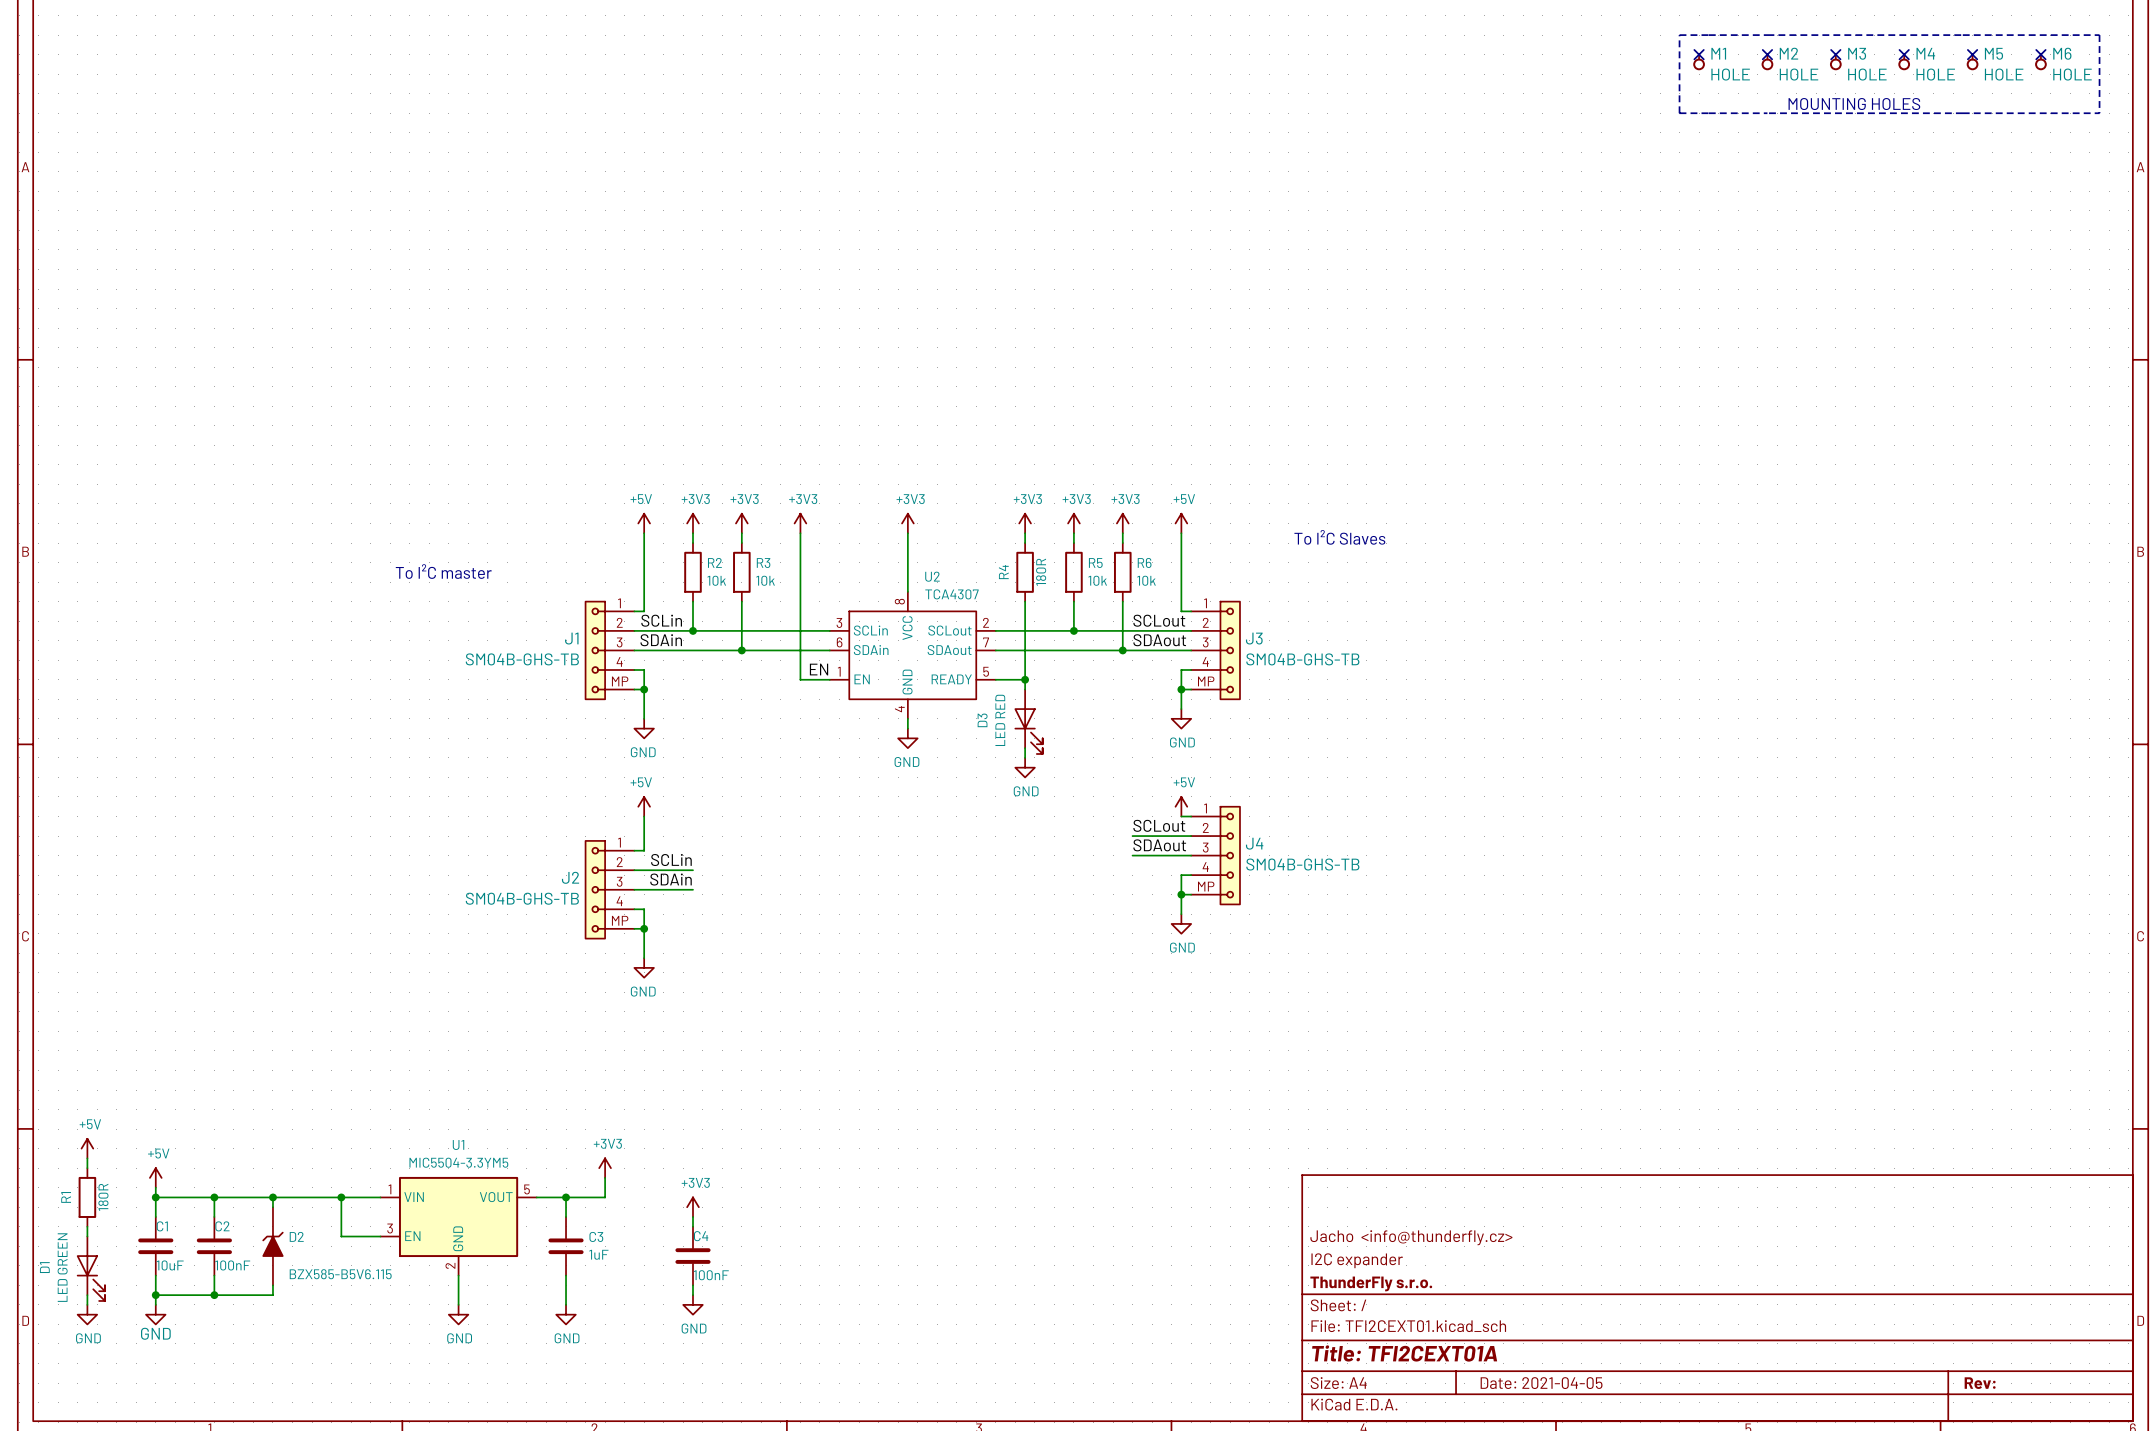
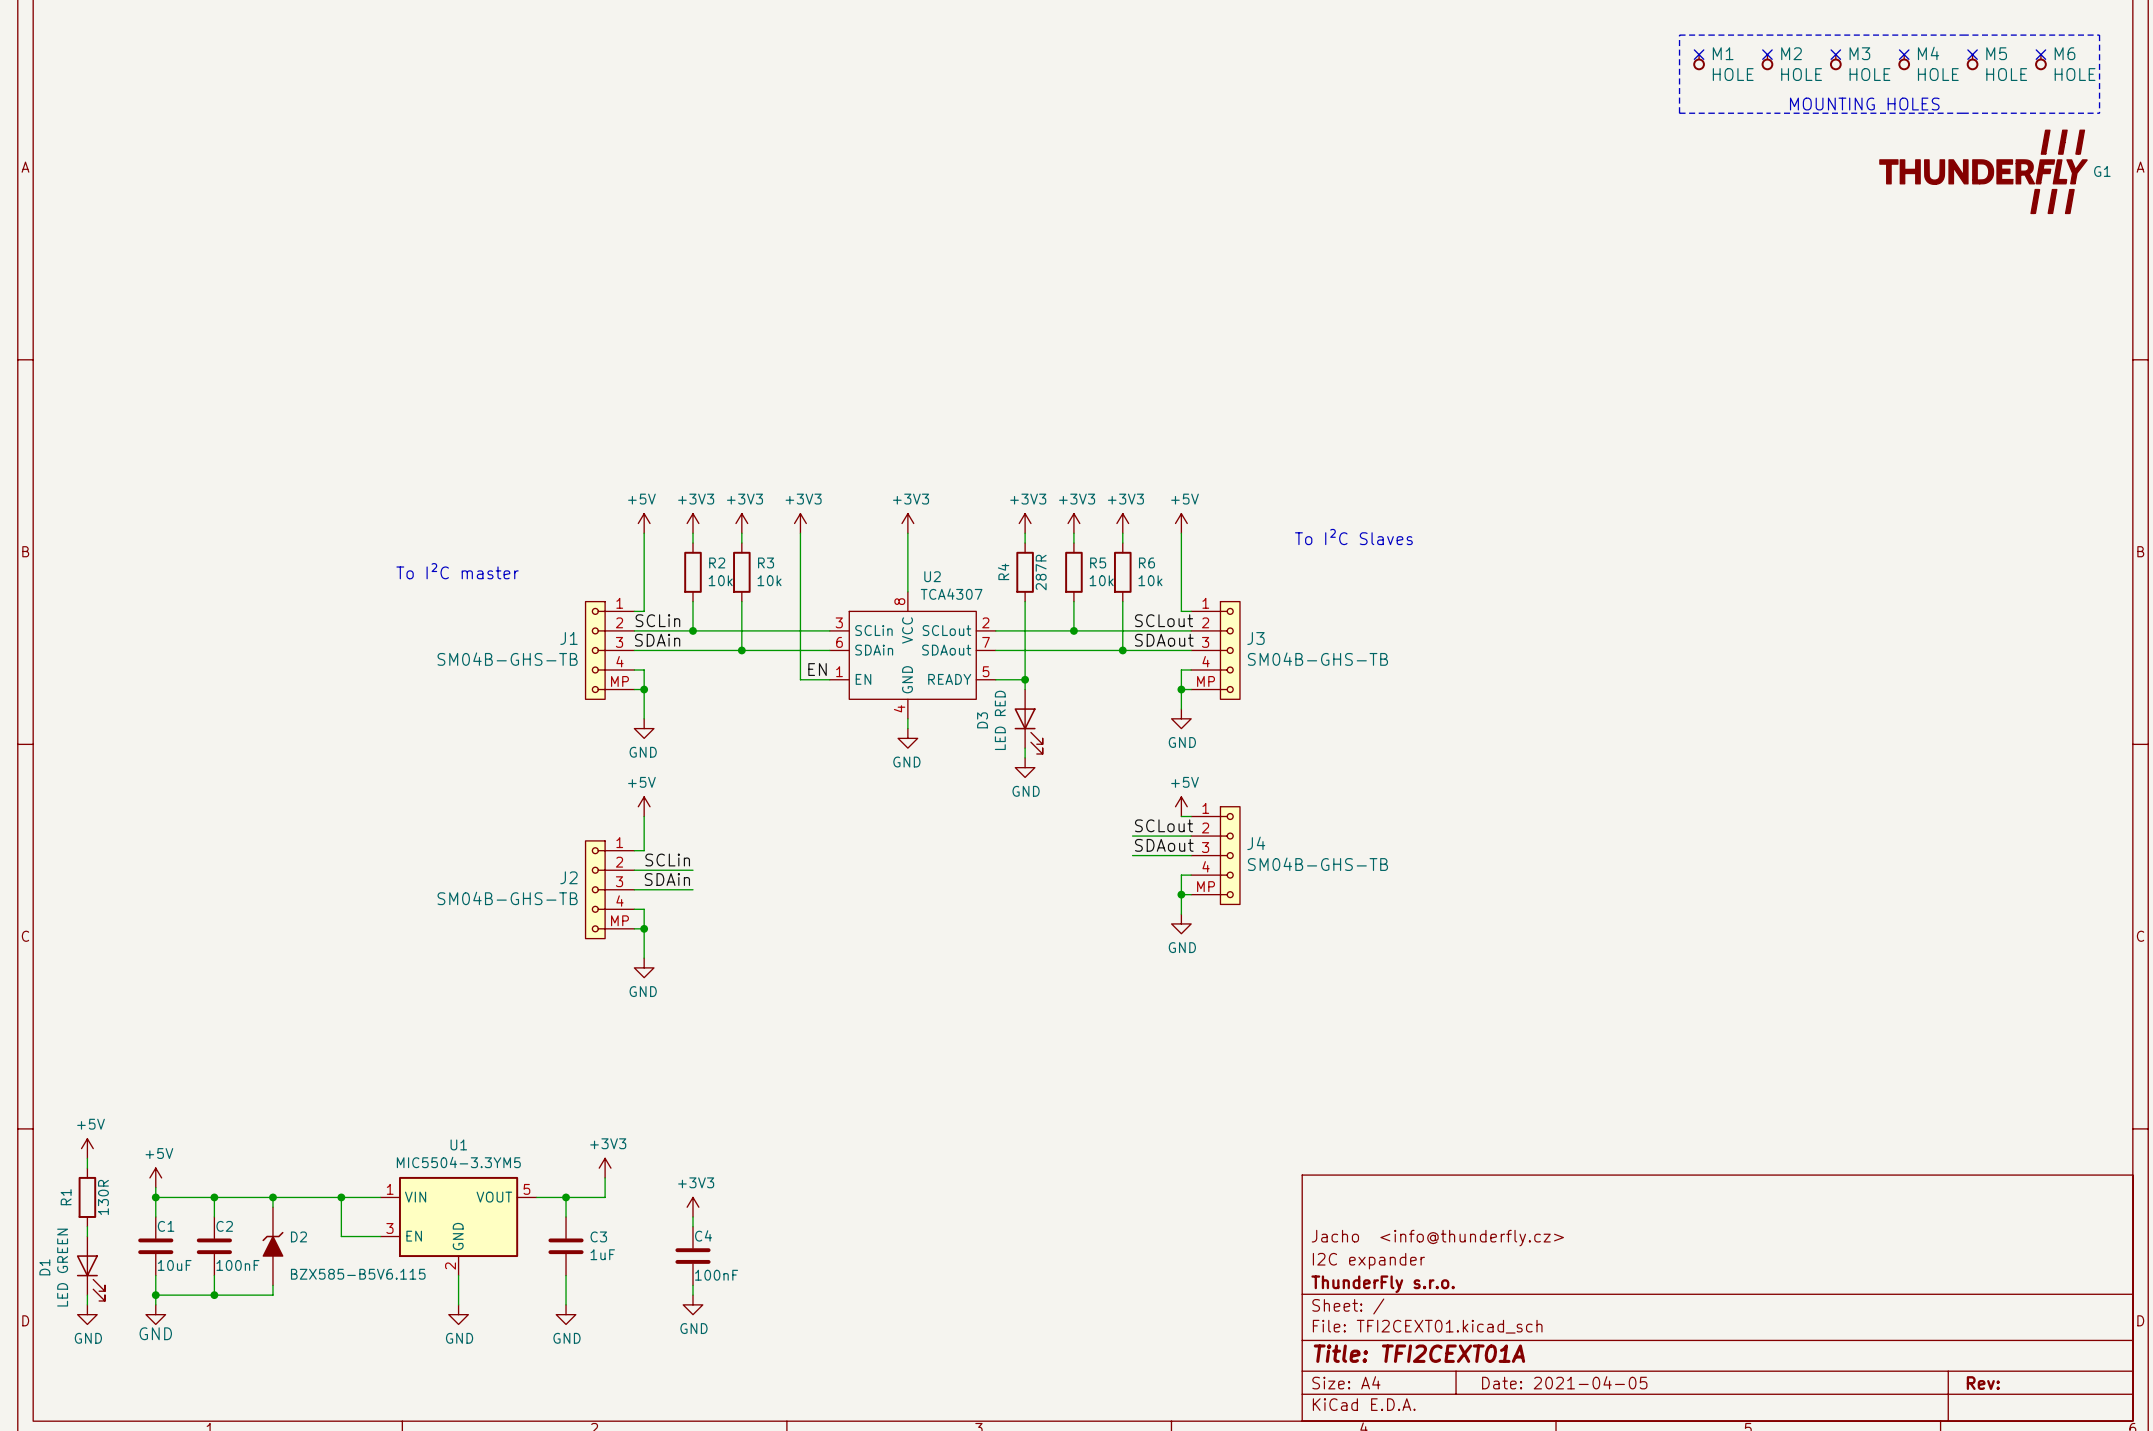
G1: none -> (1983, 171)
R4 value: 180R (1041, 572) -> 287R (1041, 572)
R1 value: 180R (103, 1197) -> 130R (103, 1197)

